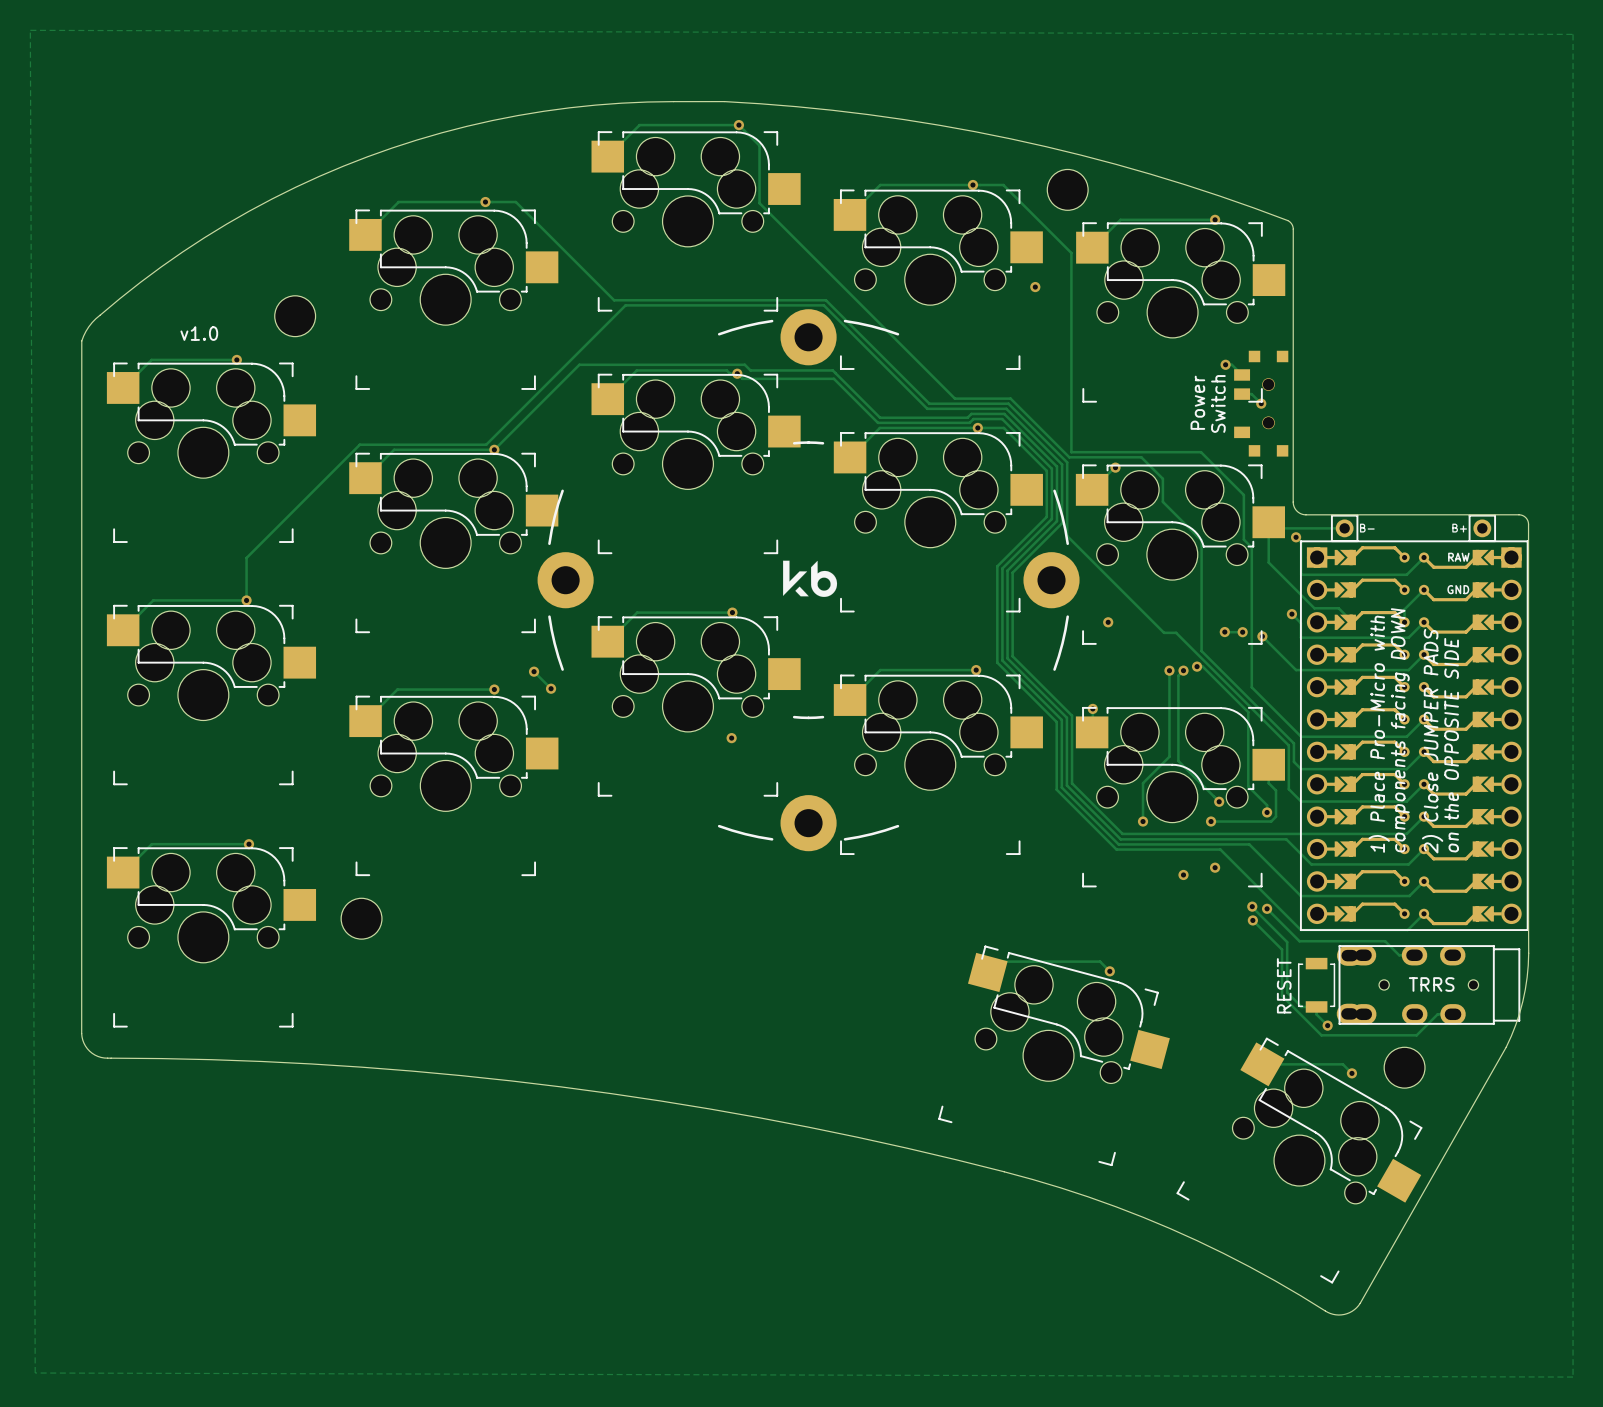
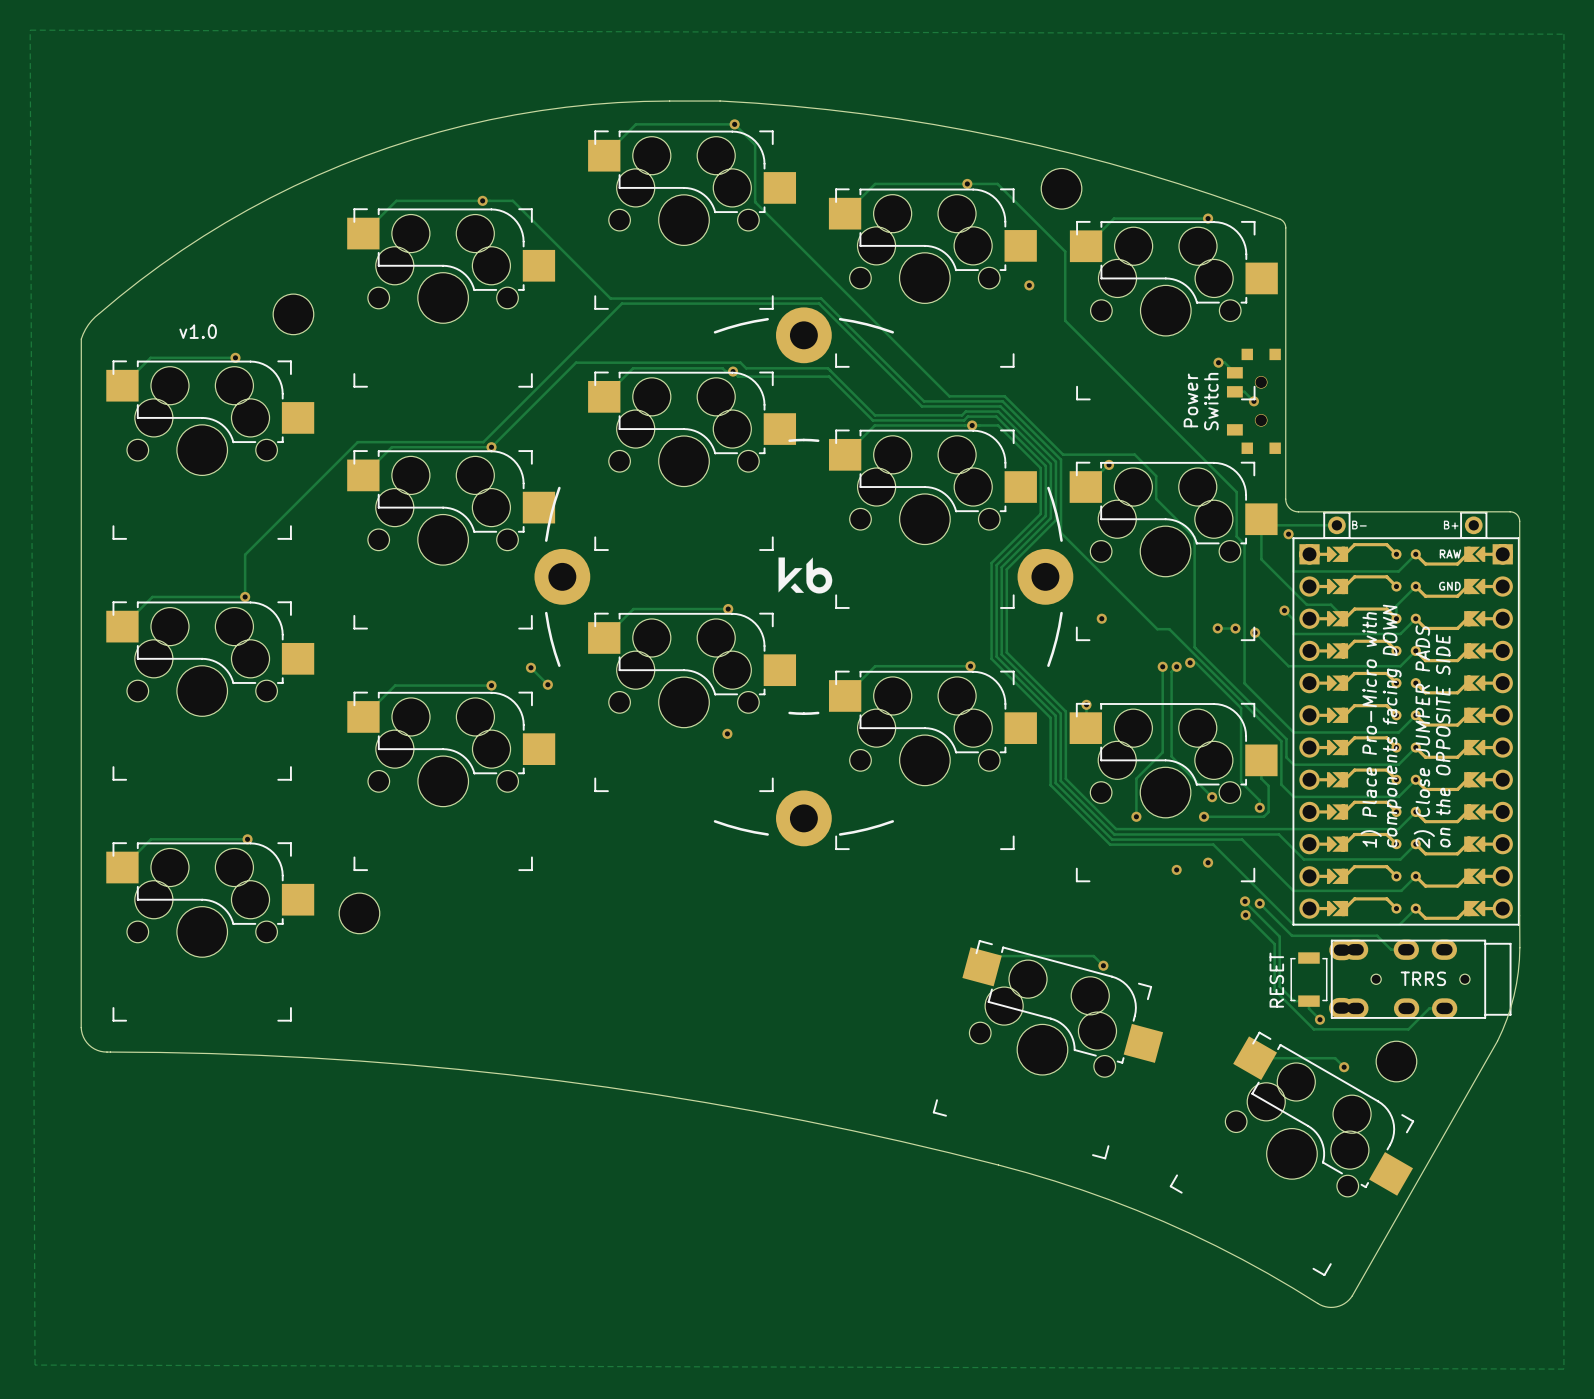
track: (1071, 322) (1071, 452) (1201, 452) -> (1065, 320) (1194, 449)

